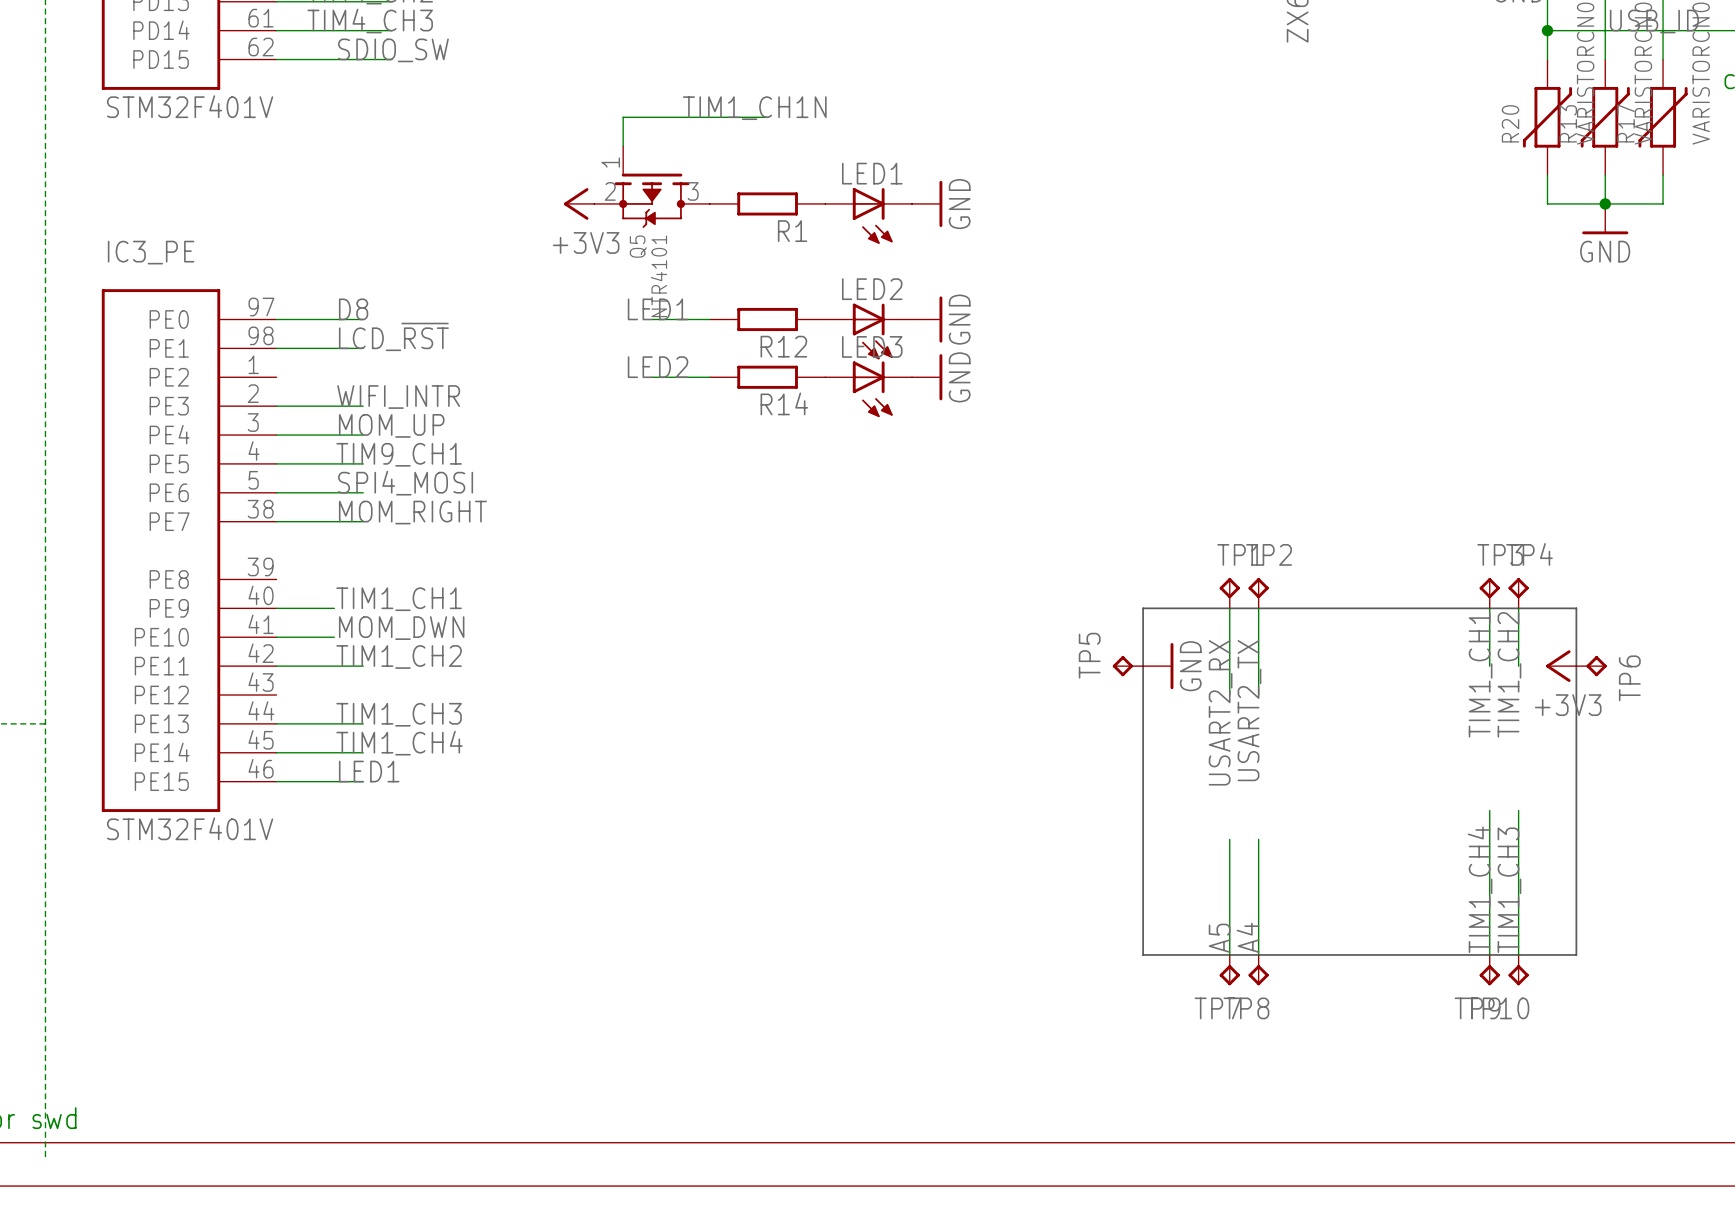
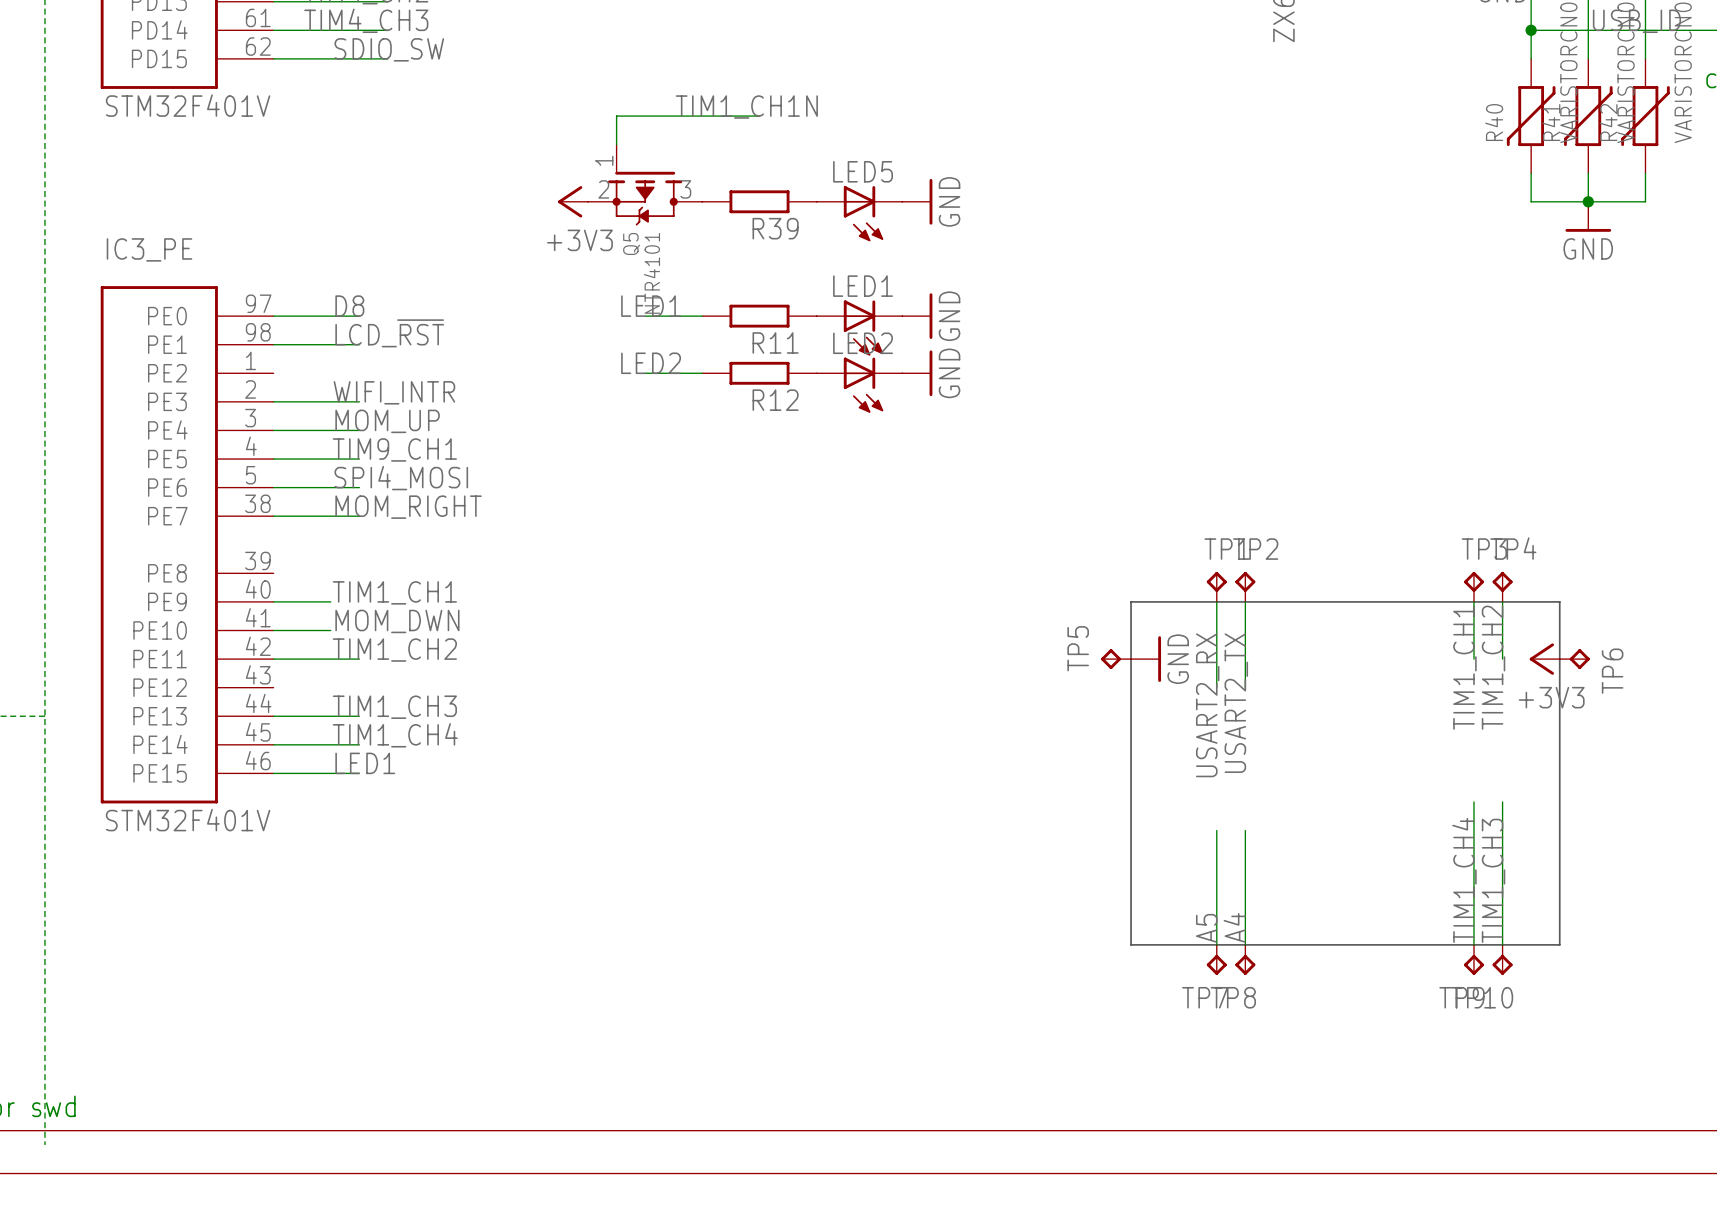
R20 name: R20 (1510, 123) -> R40 (1494, 122)
R13 name: R13 (1568, 123) -> R41 (1551, 122)
R17 name: R17 (1626, 123) -> R42 (1608, 122)
LED1 name: LED1 (872, 173) -> LED5 (863, 171)
R1 name: R1 (792, 231) -> R39 (775, 228)
LED2 name: LED2 (872, 289) -> LED1 (863, 286)
R12 name: R12 (783, 346) -> R11 (775, 342)
LED3 name: LED3 (872, 346) -> LED2 (863, 343)
R14 name: R14 (784, 403) -> R12 (775, 400)

